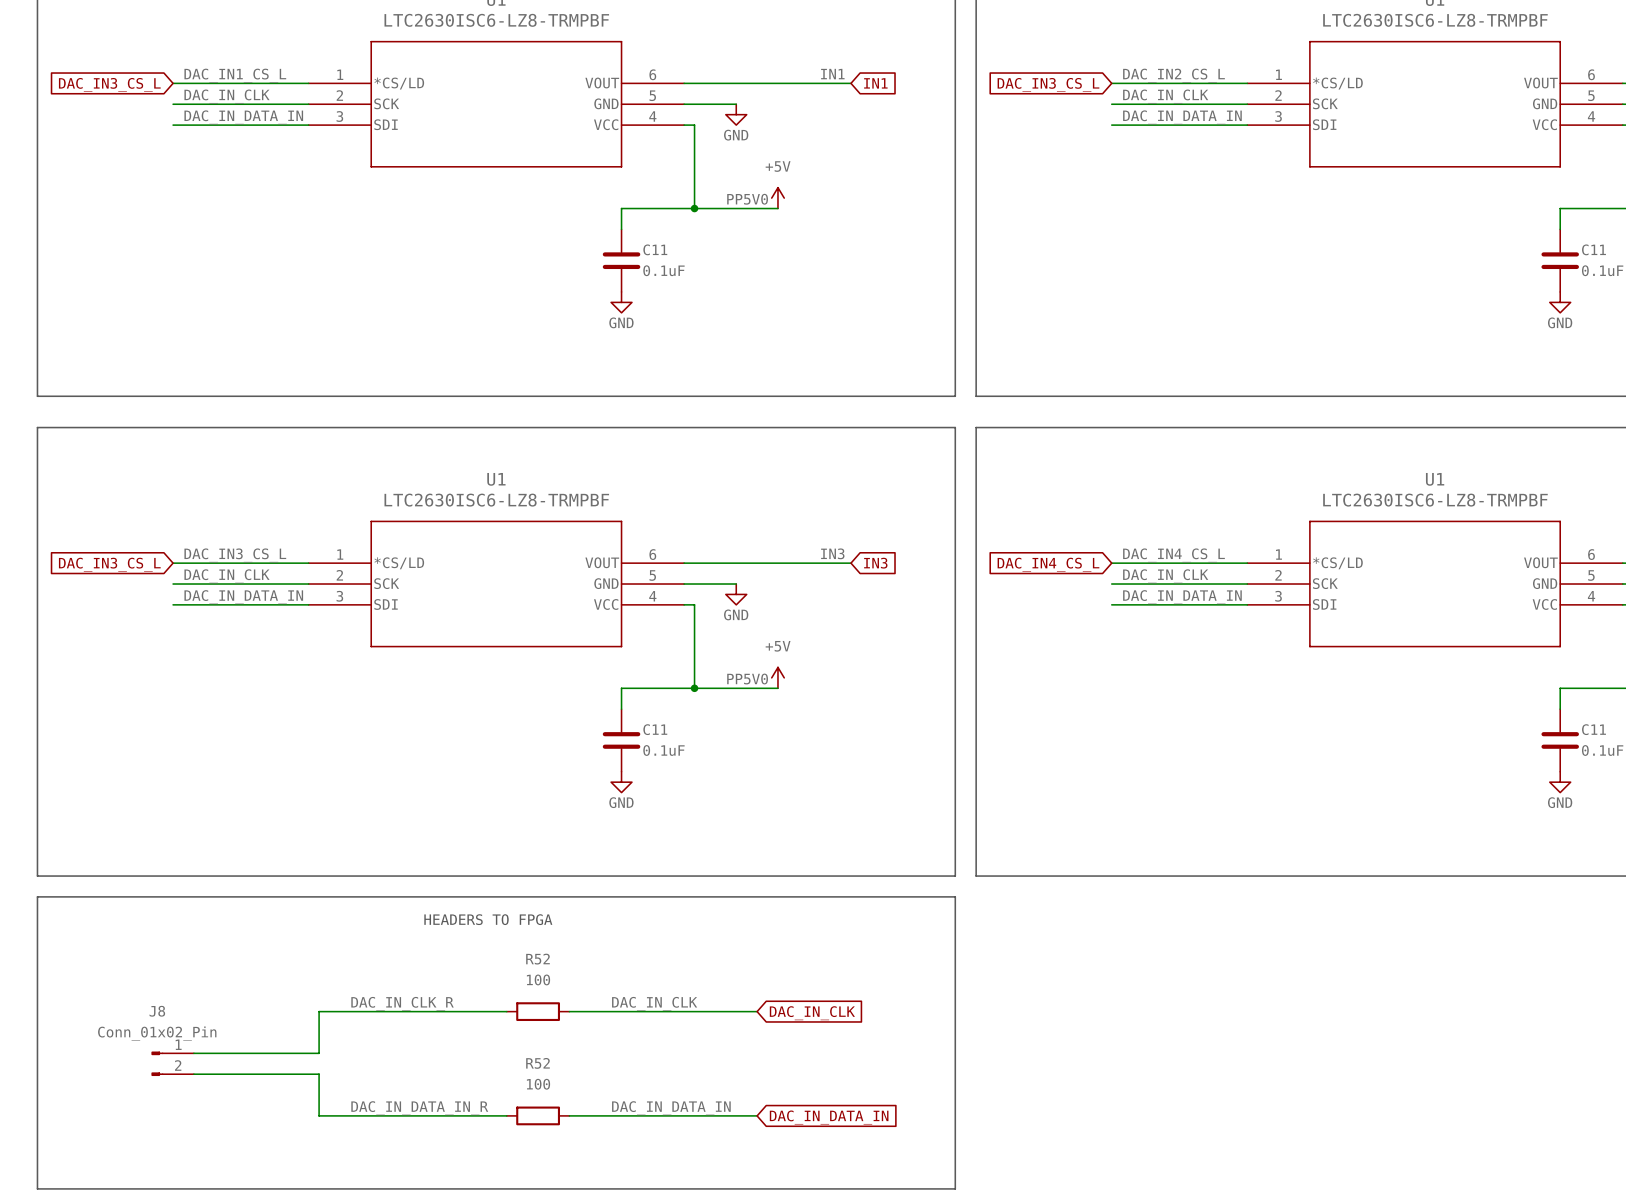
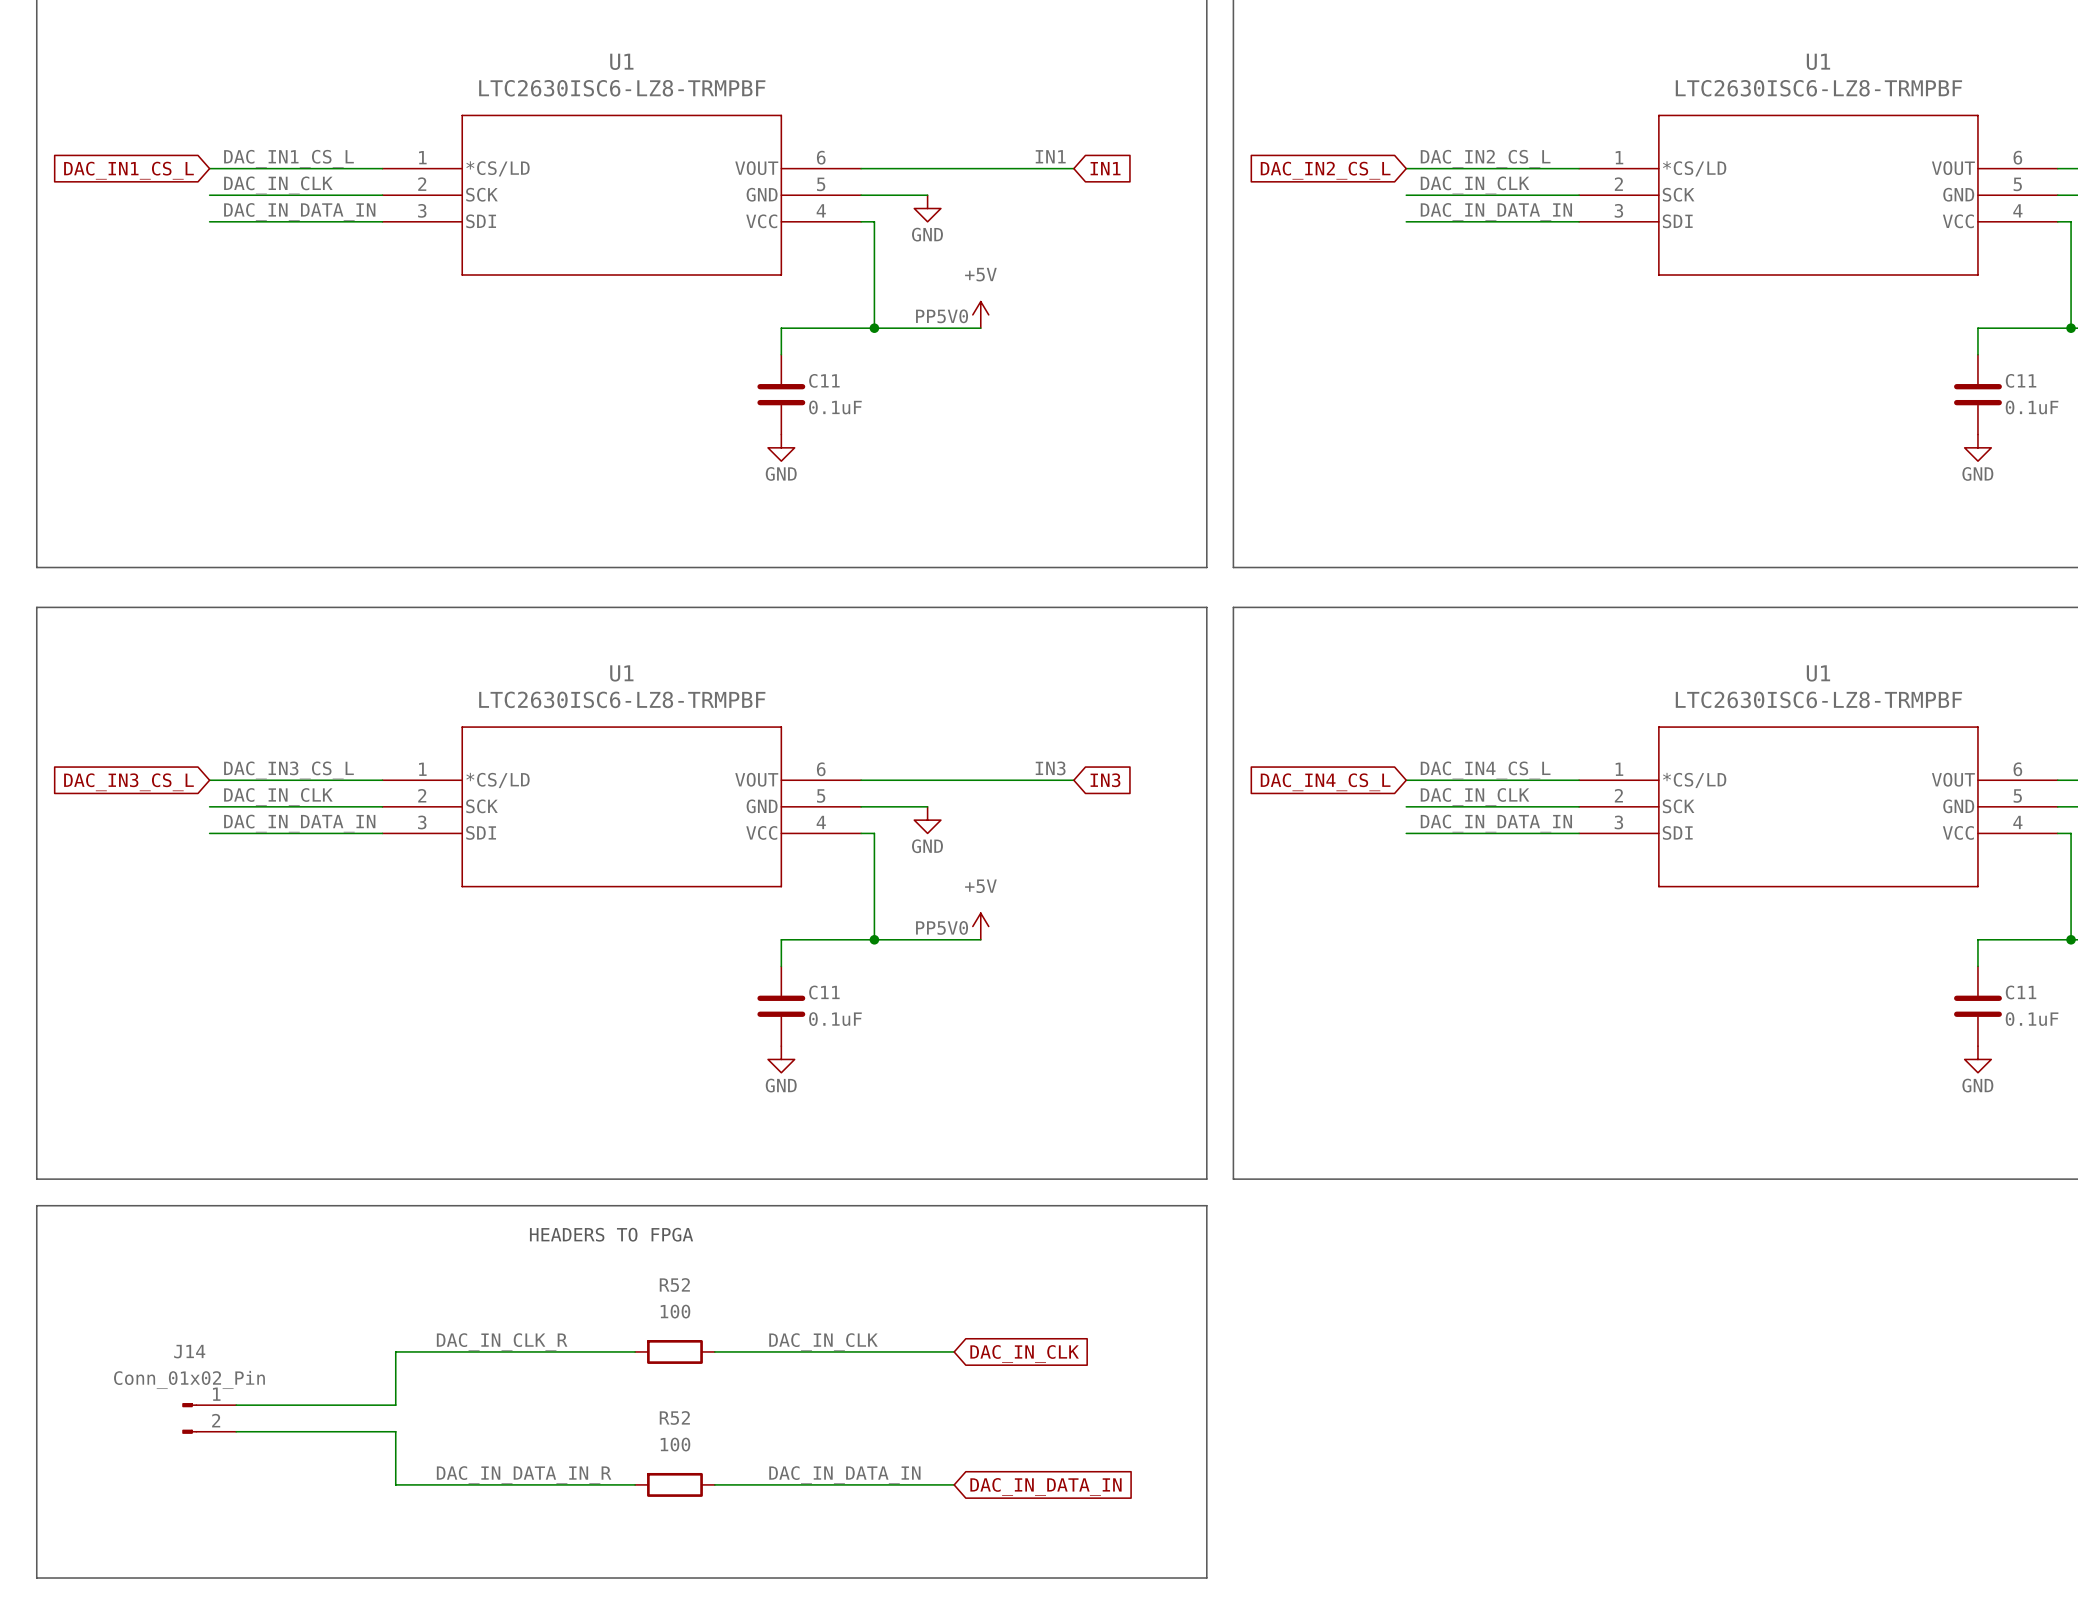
global label: DAC_IN3_CS_L (109, 84) -> DAC_IN1_CS_L (128, 170)
global label: DAC_IN3_CS_L (1048, 84) -> DAC_IN2_CS_L (1325, 170)
J8 name: J8 (157, 1011) -> J14 (189, 1351)

